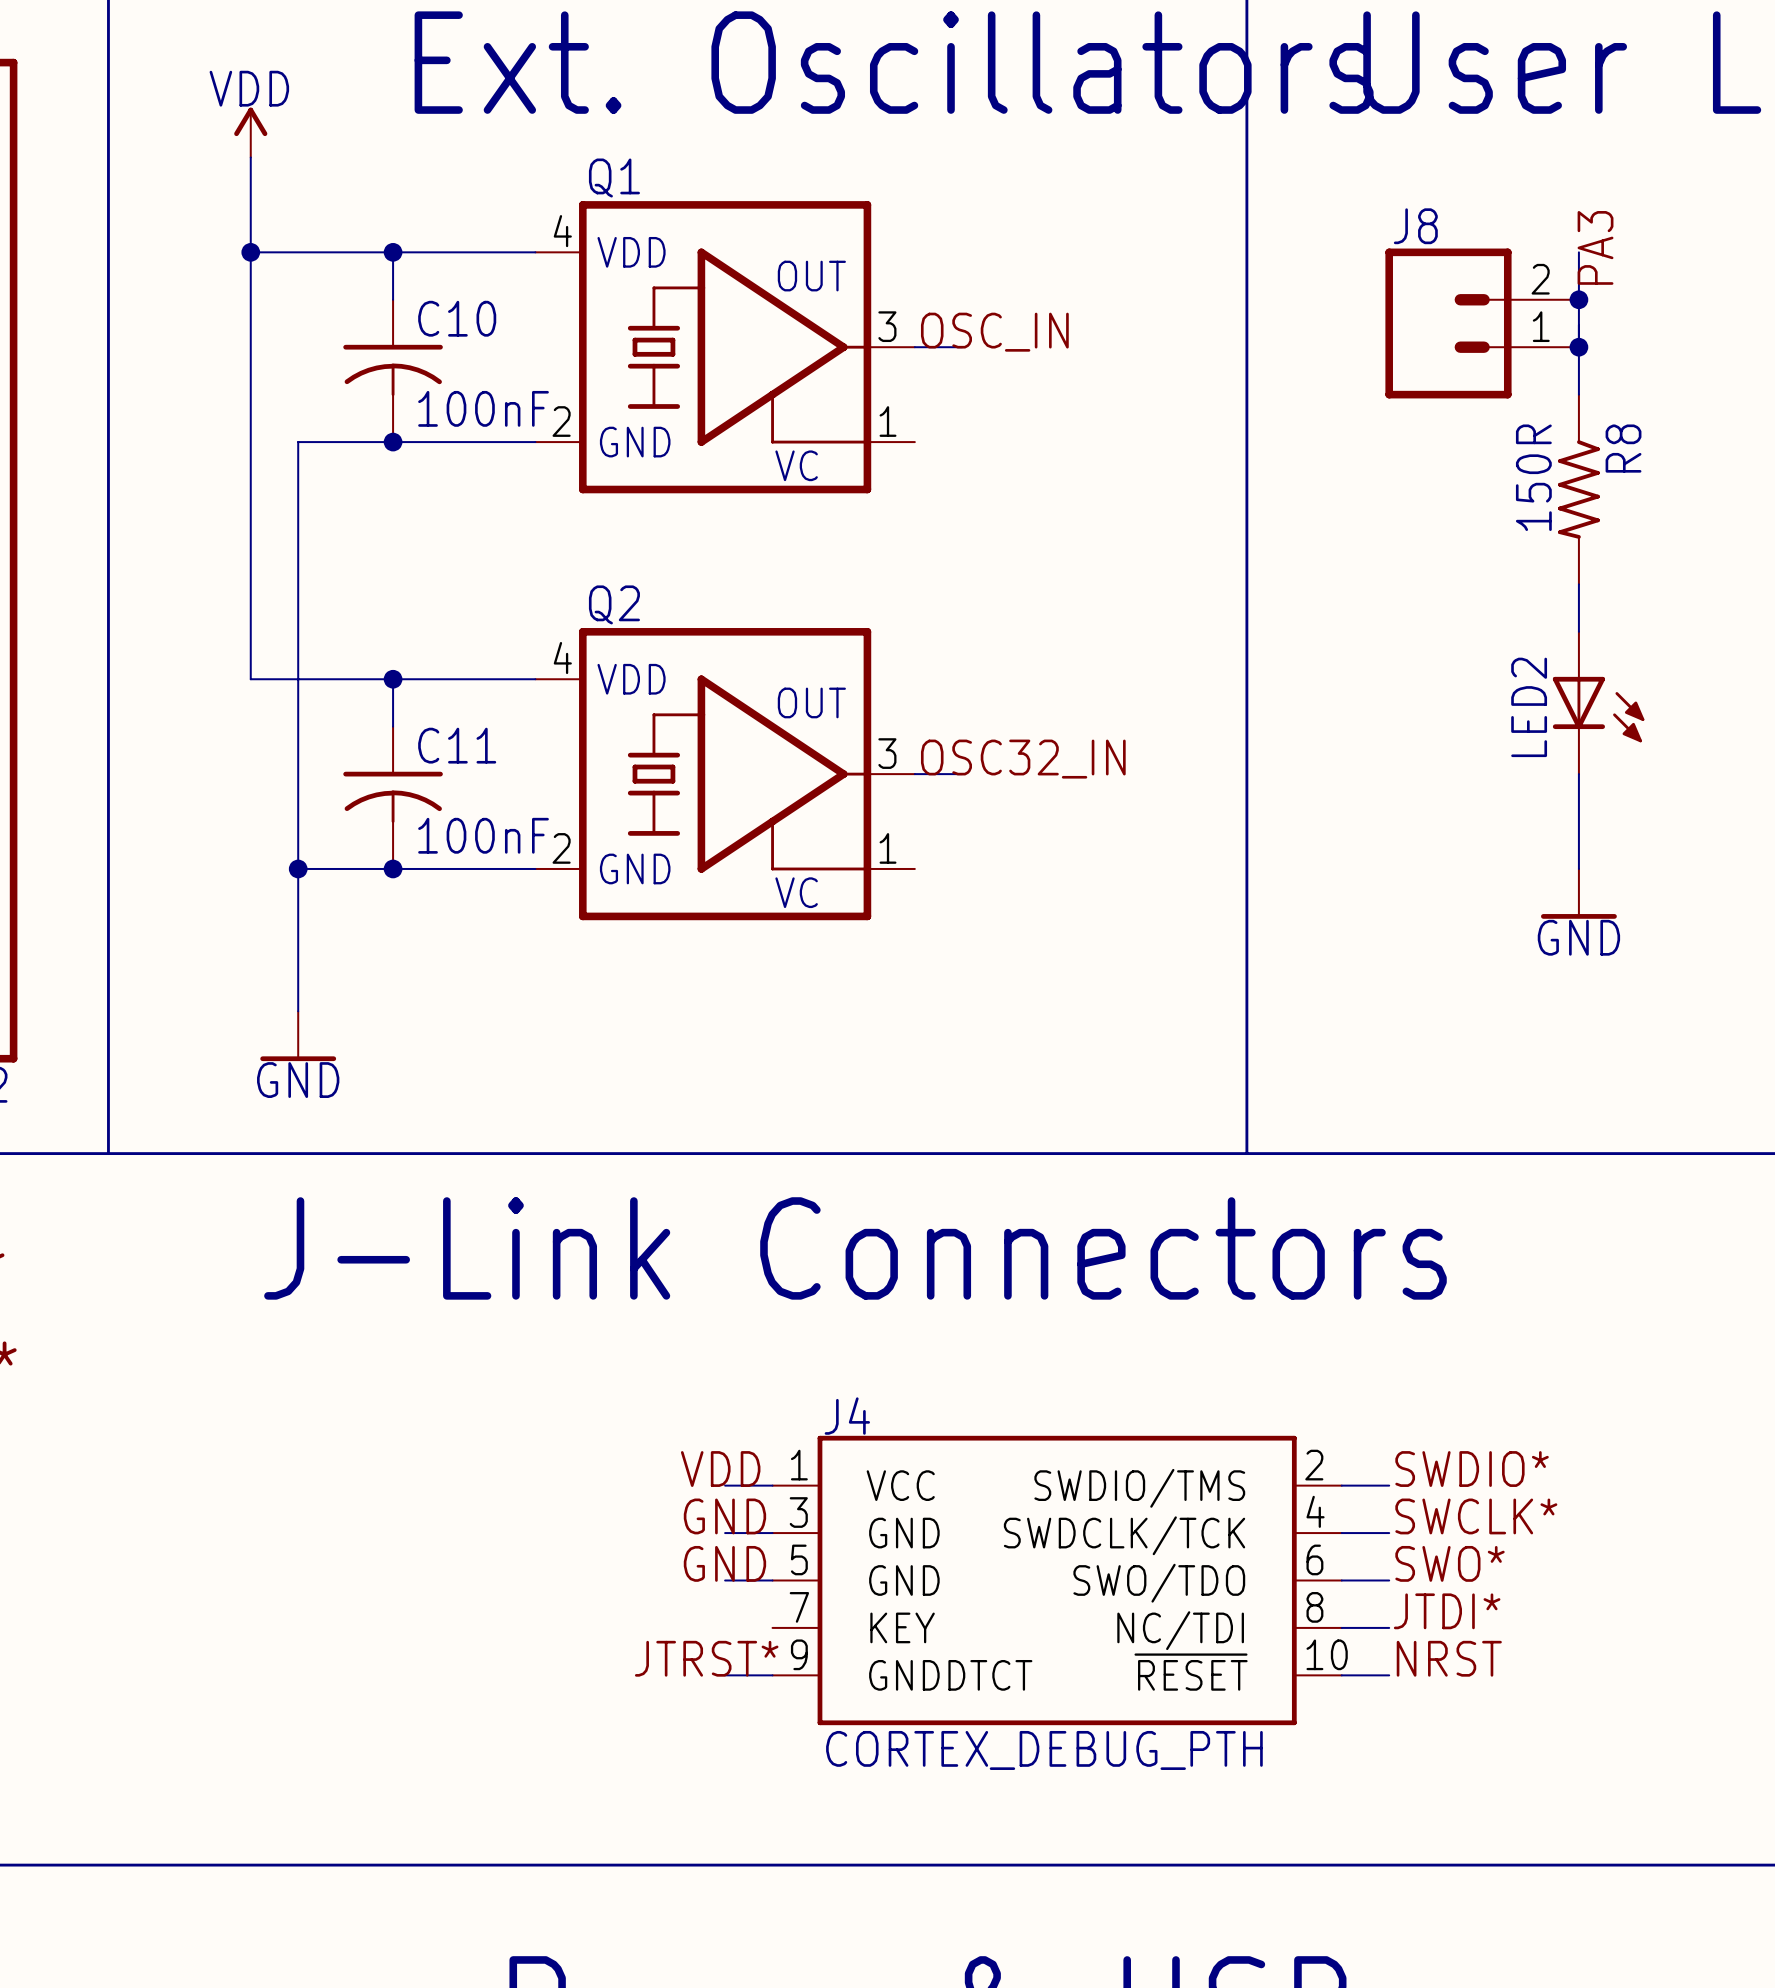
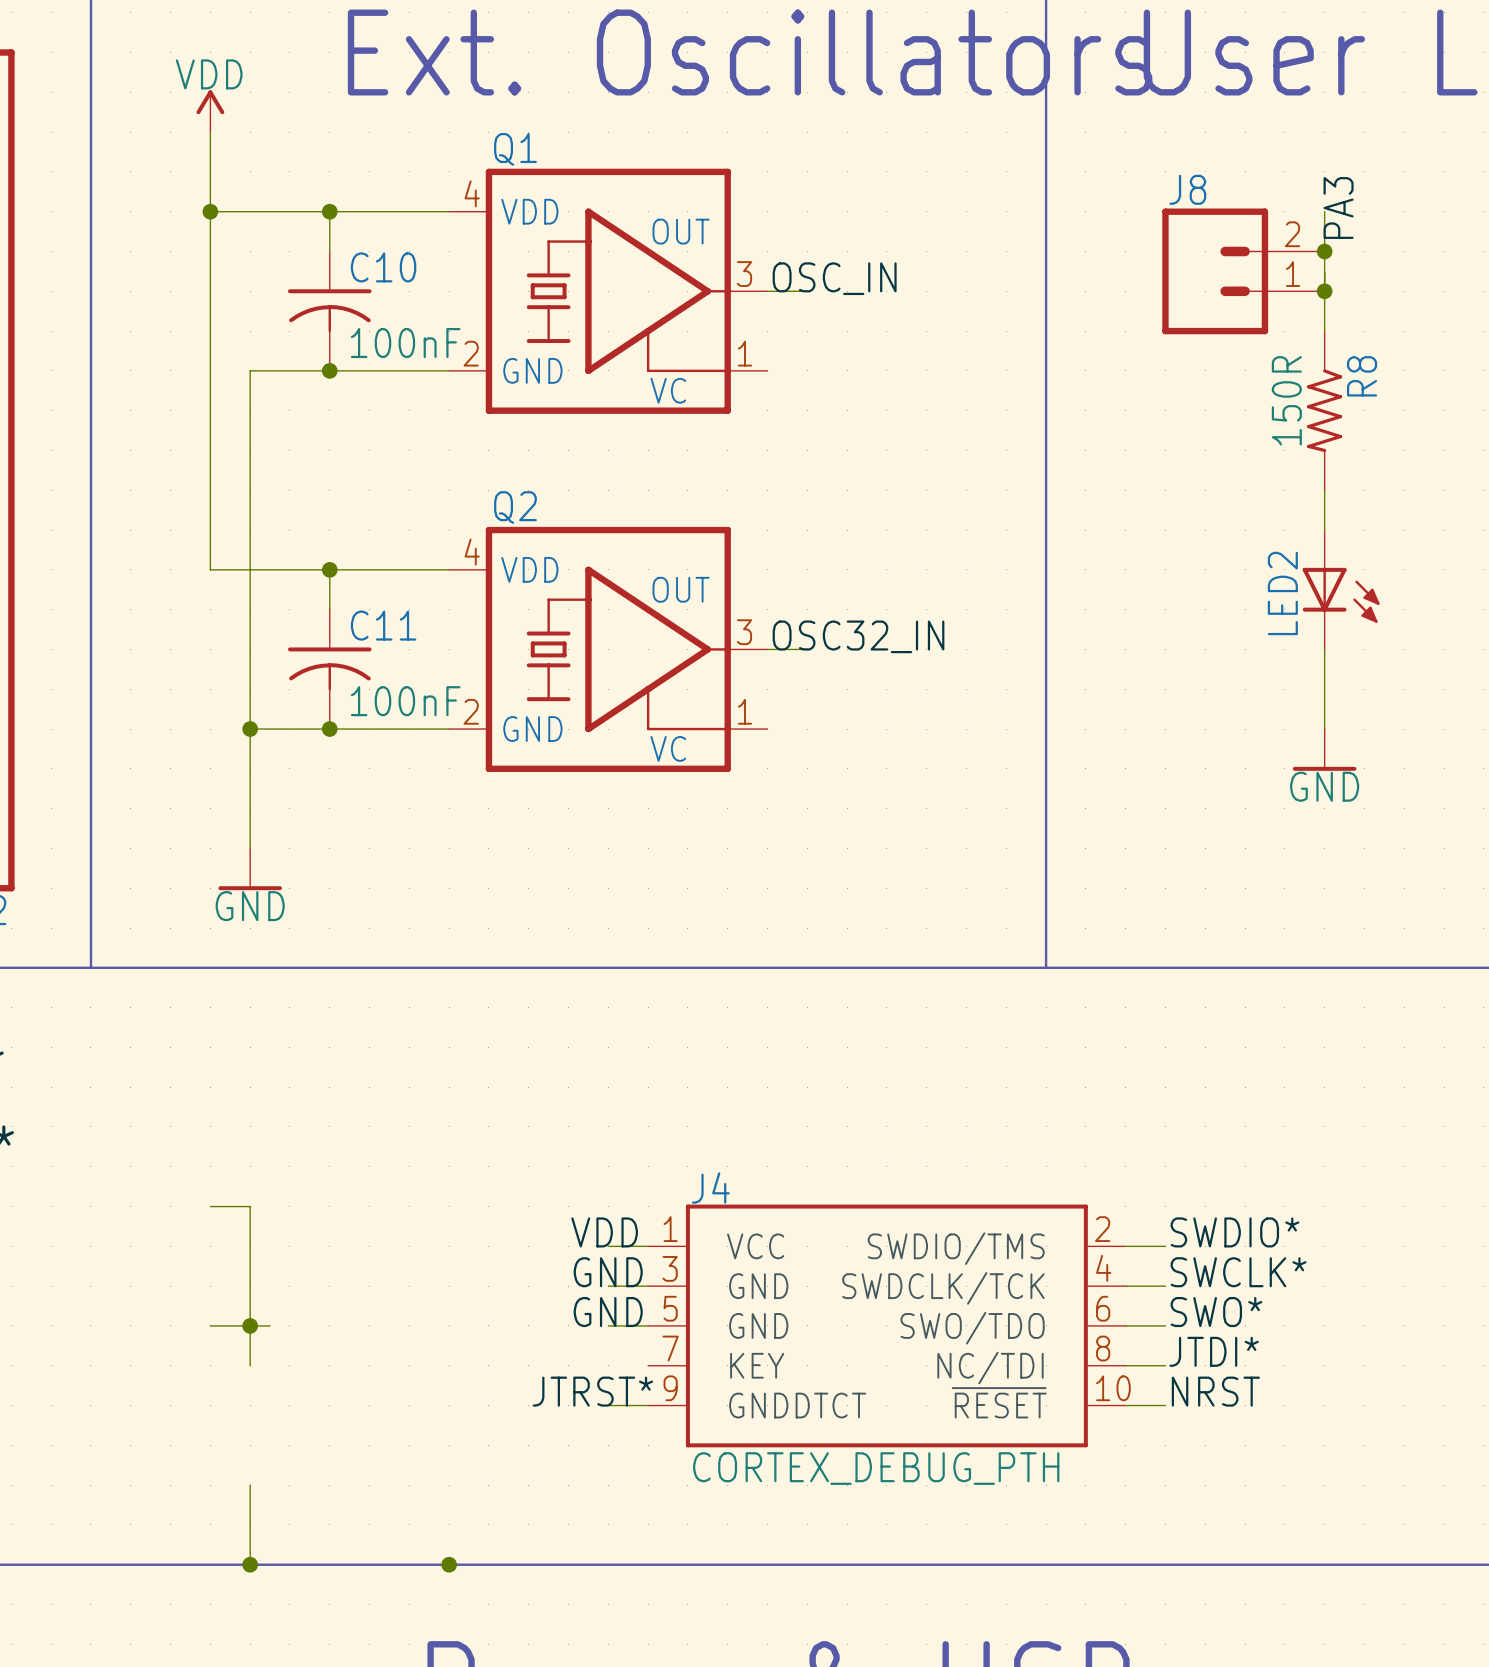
text: J-Link Connectors (855, 1248) -> none
wire: none -> (210, 1206) (250, 1206) (250, 1365)
wire: none -> (210, 1325) (270, 1325)
junction: none -> (250, 1325)
wire: none -> (250, 1485) (250, 1564)
junction: none -> (250, 1564)
junction: none -> (449, 1564)

